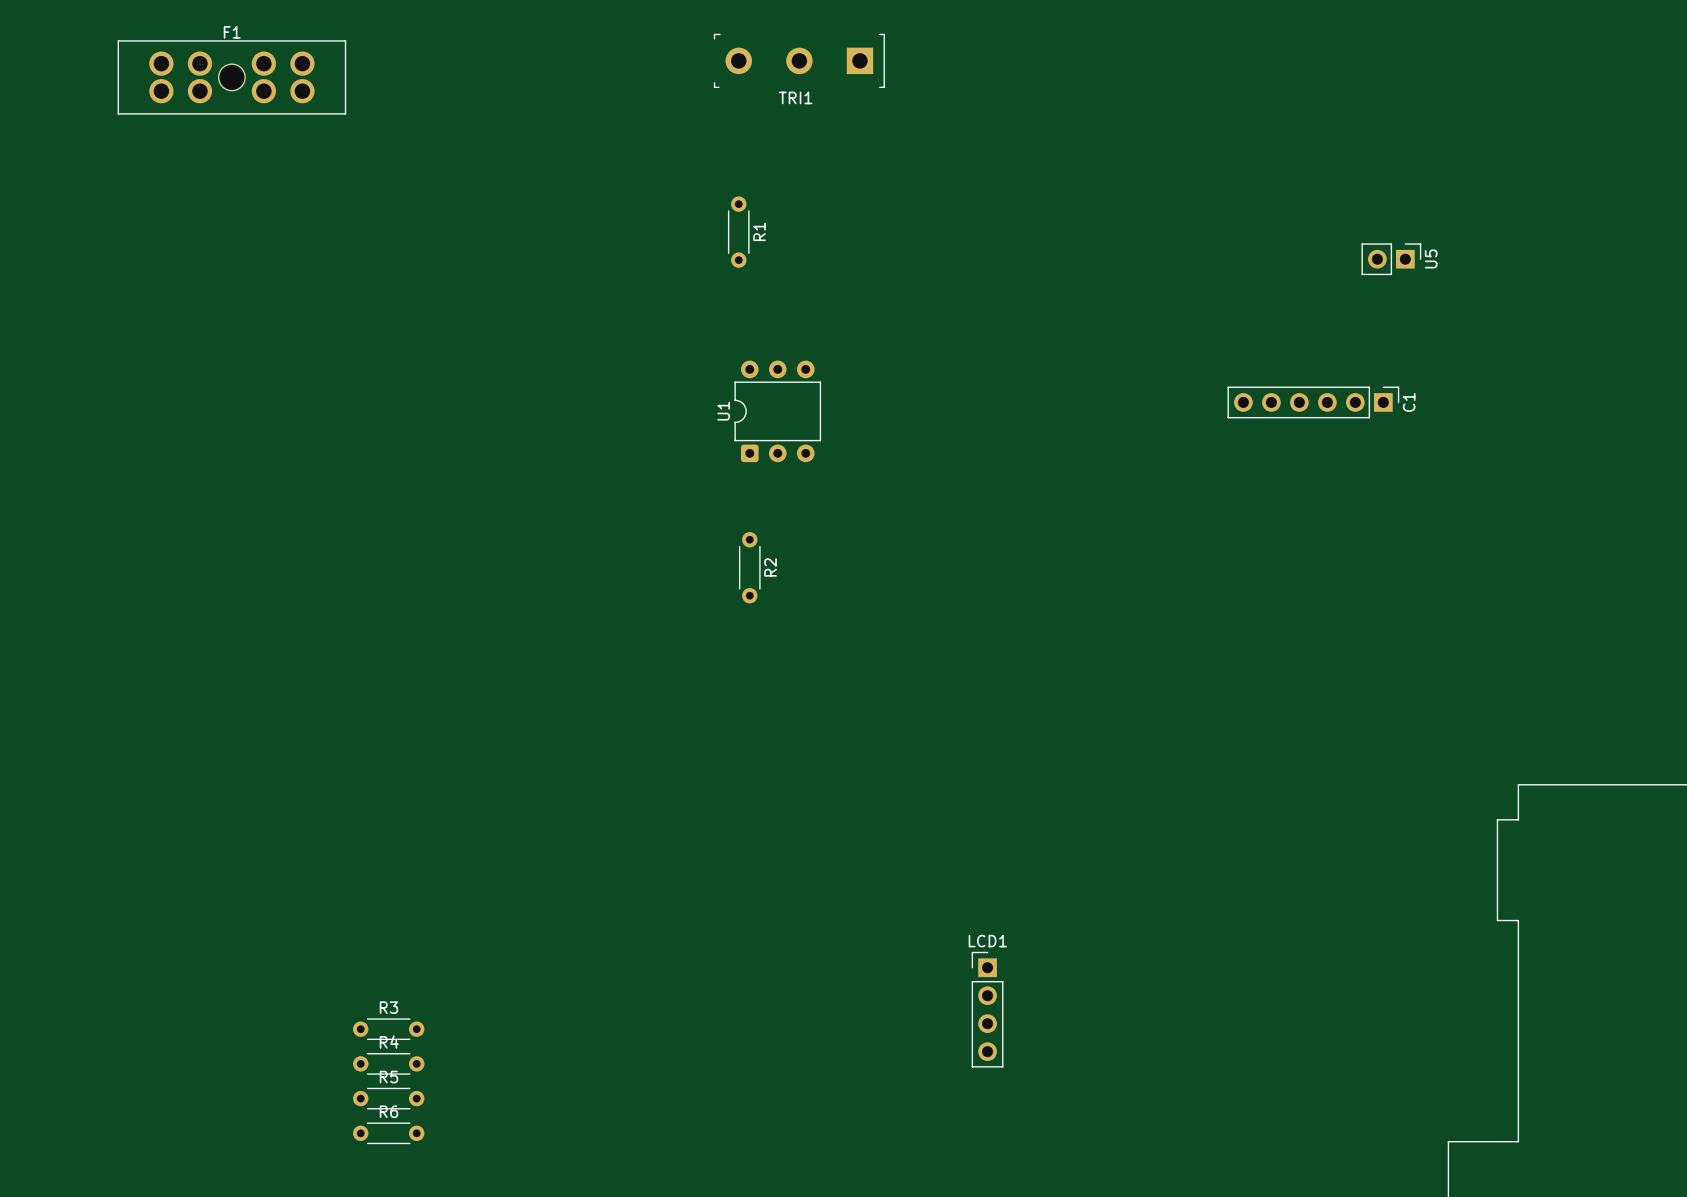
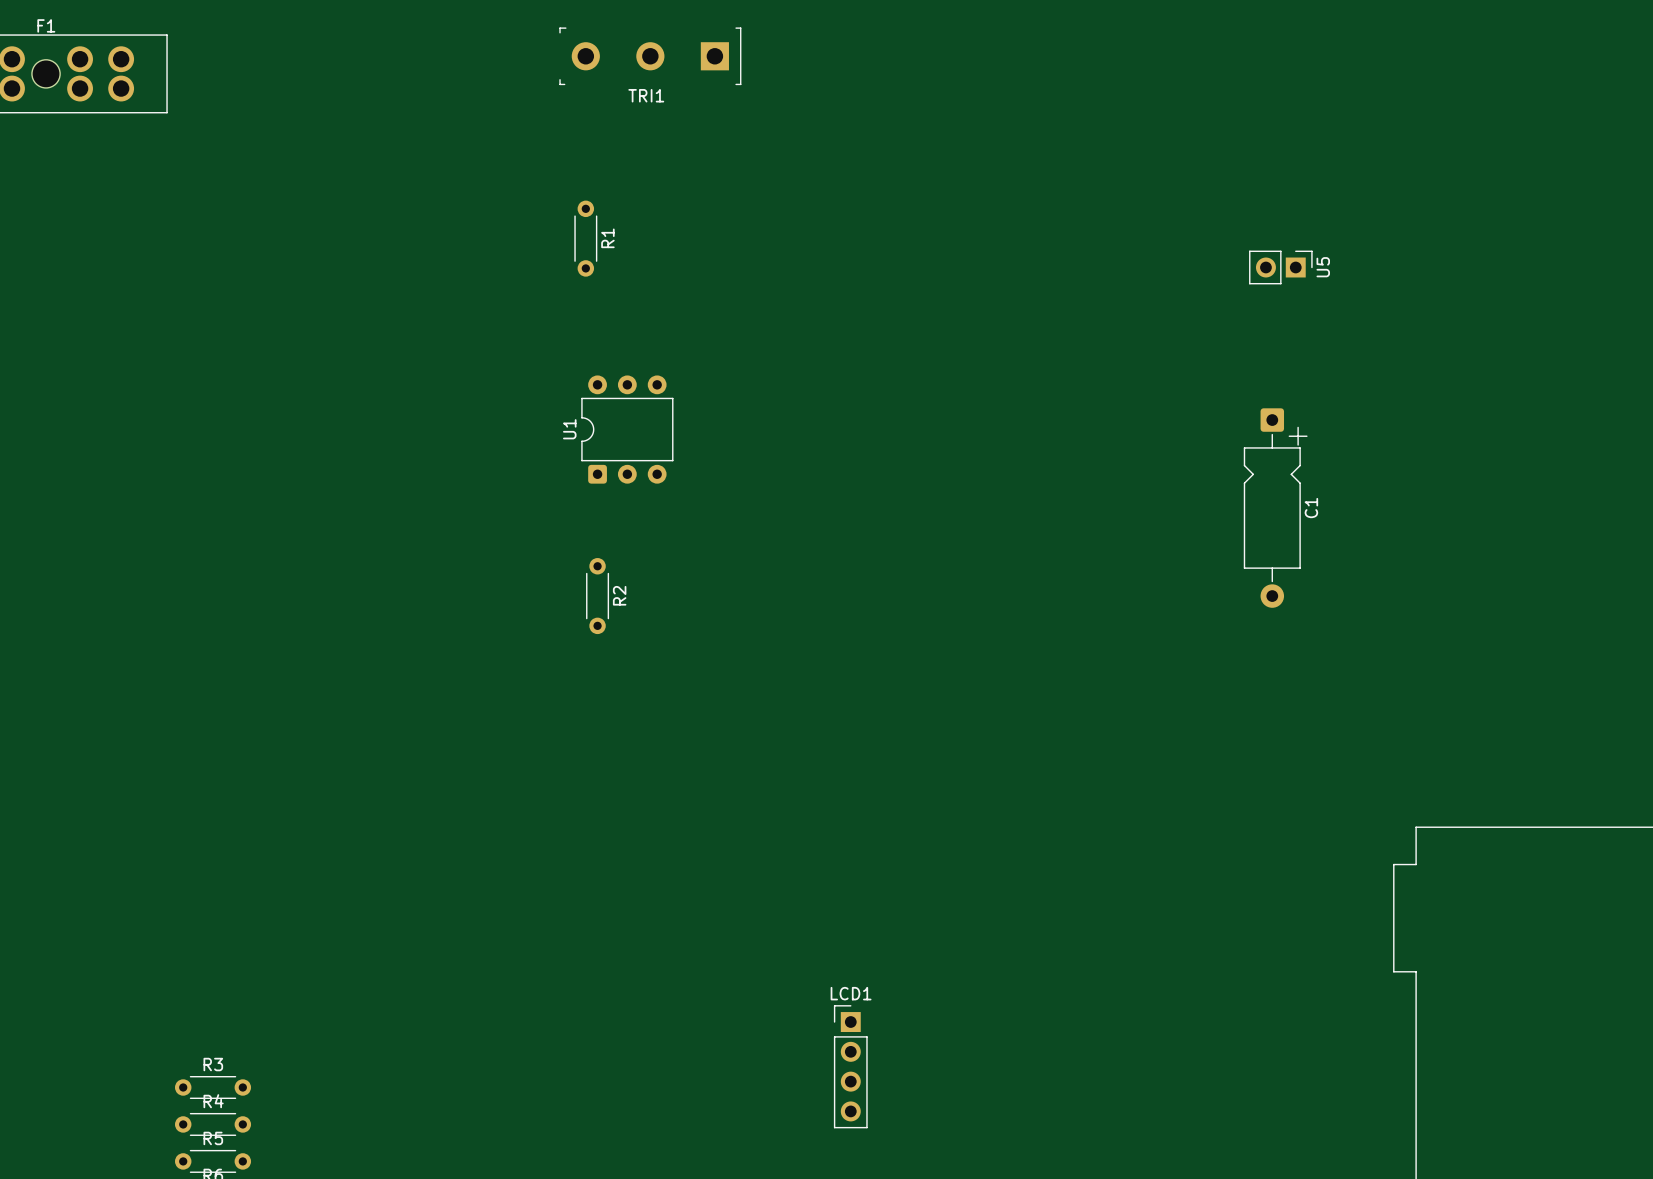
C1 footprint: [1227, 386, 1400, 419] -> [1243, 408, 1308, 608]
C1 name position: C1 (1409, 402) -> C1 (1311, 508)

